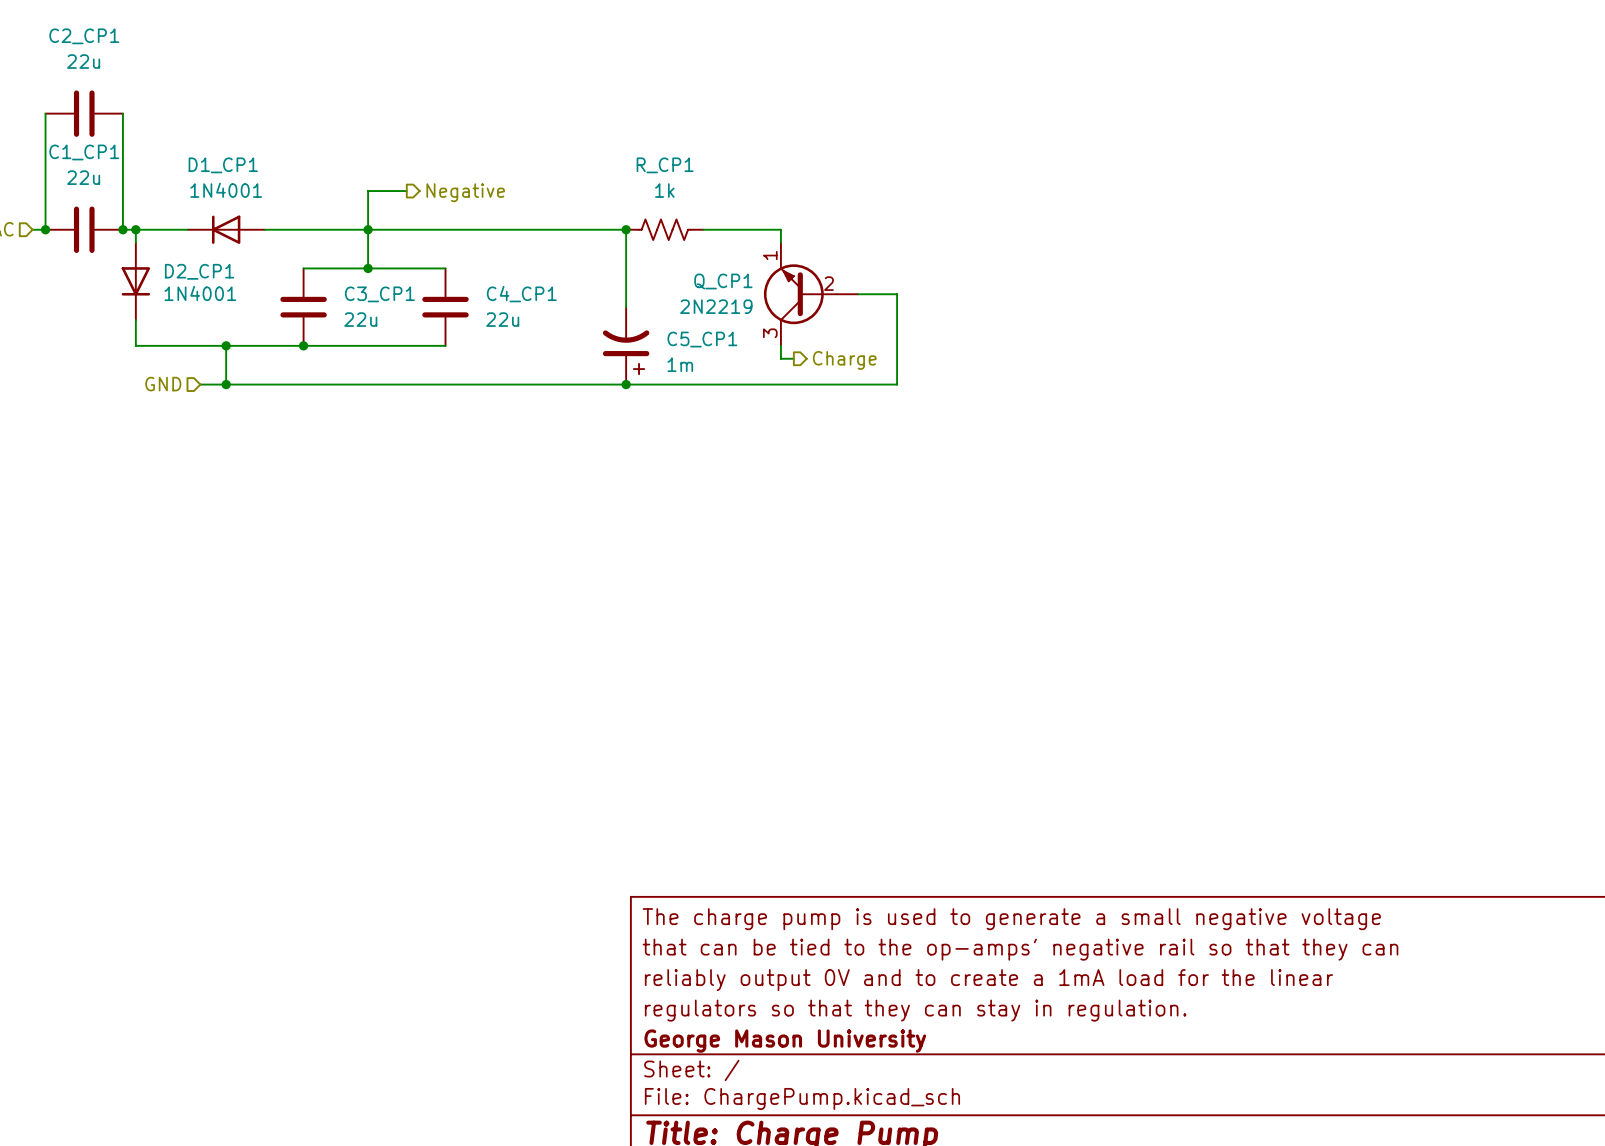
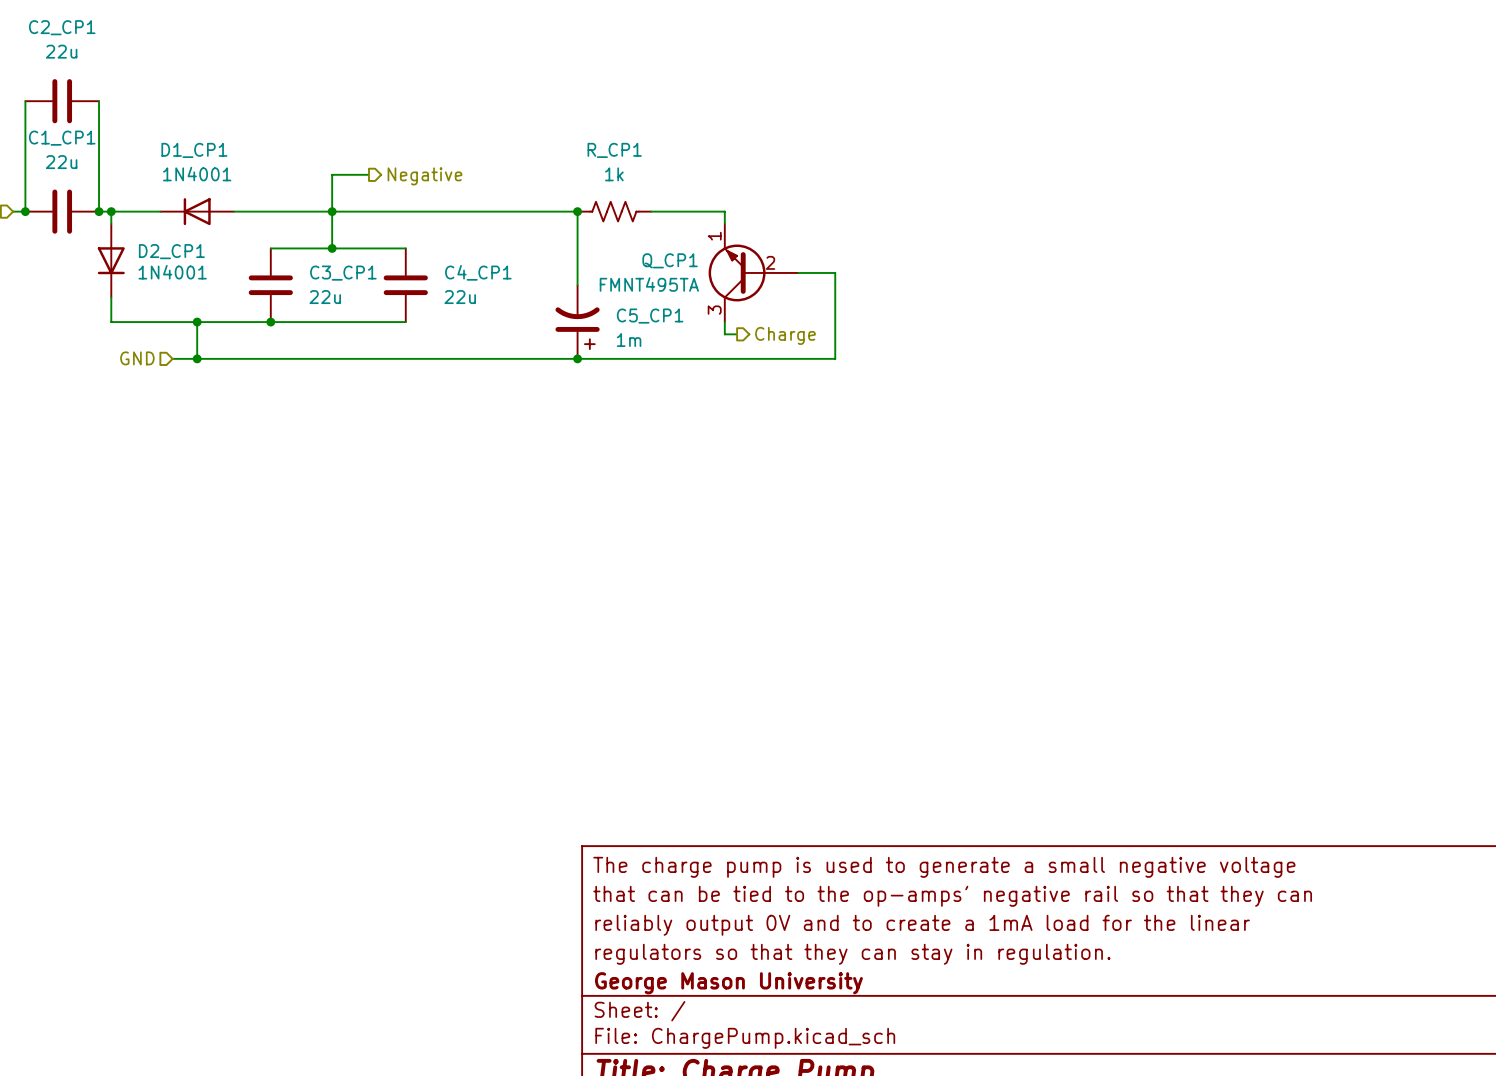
Q_CP1 value: 2N2219 (716, 306) -> FMNT495TA (649, 284)

